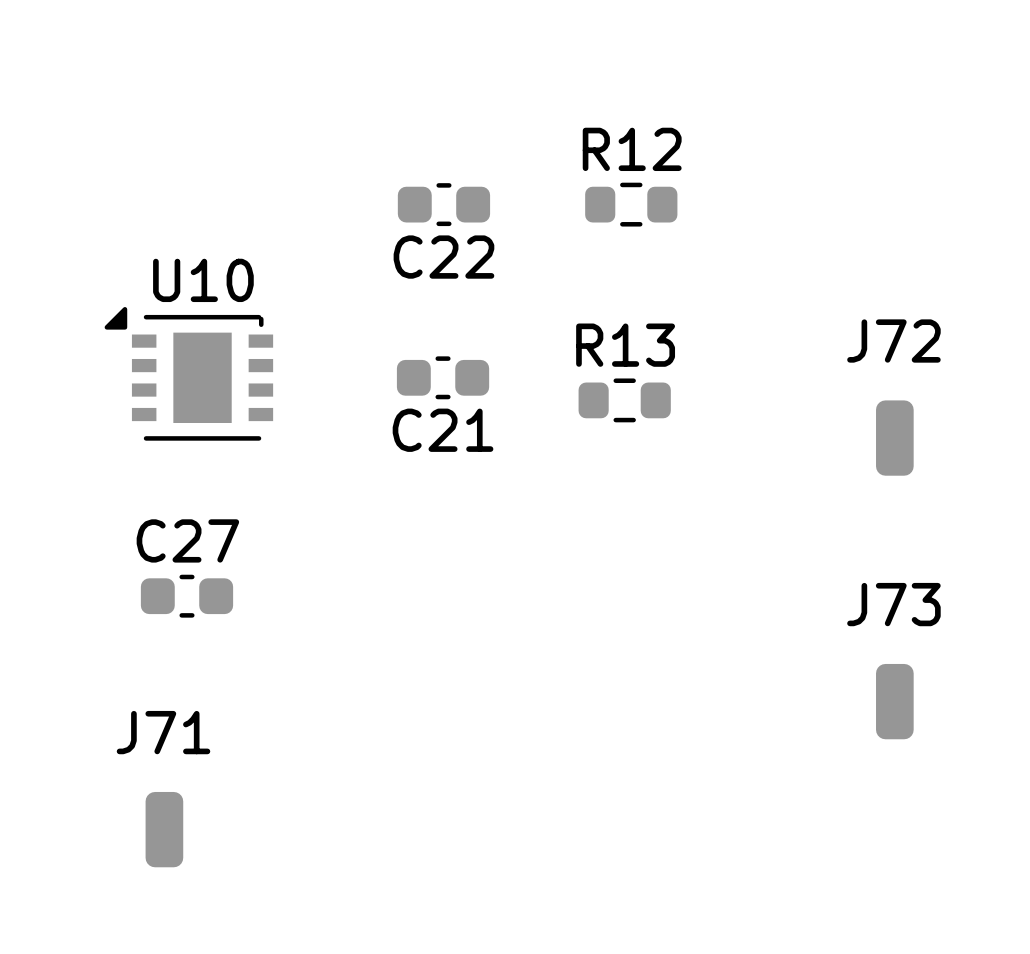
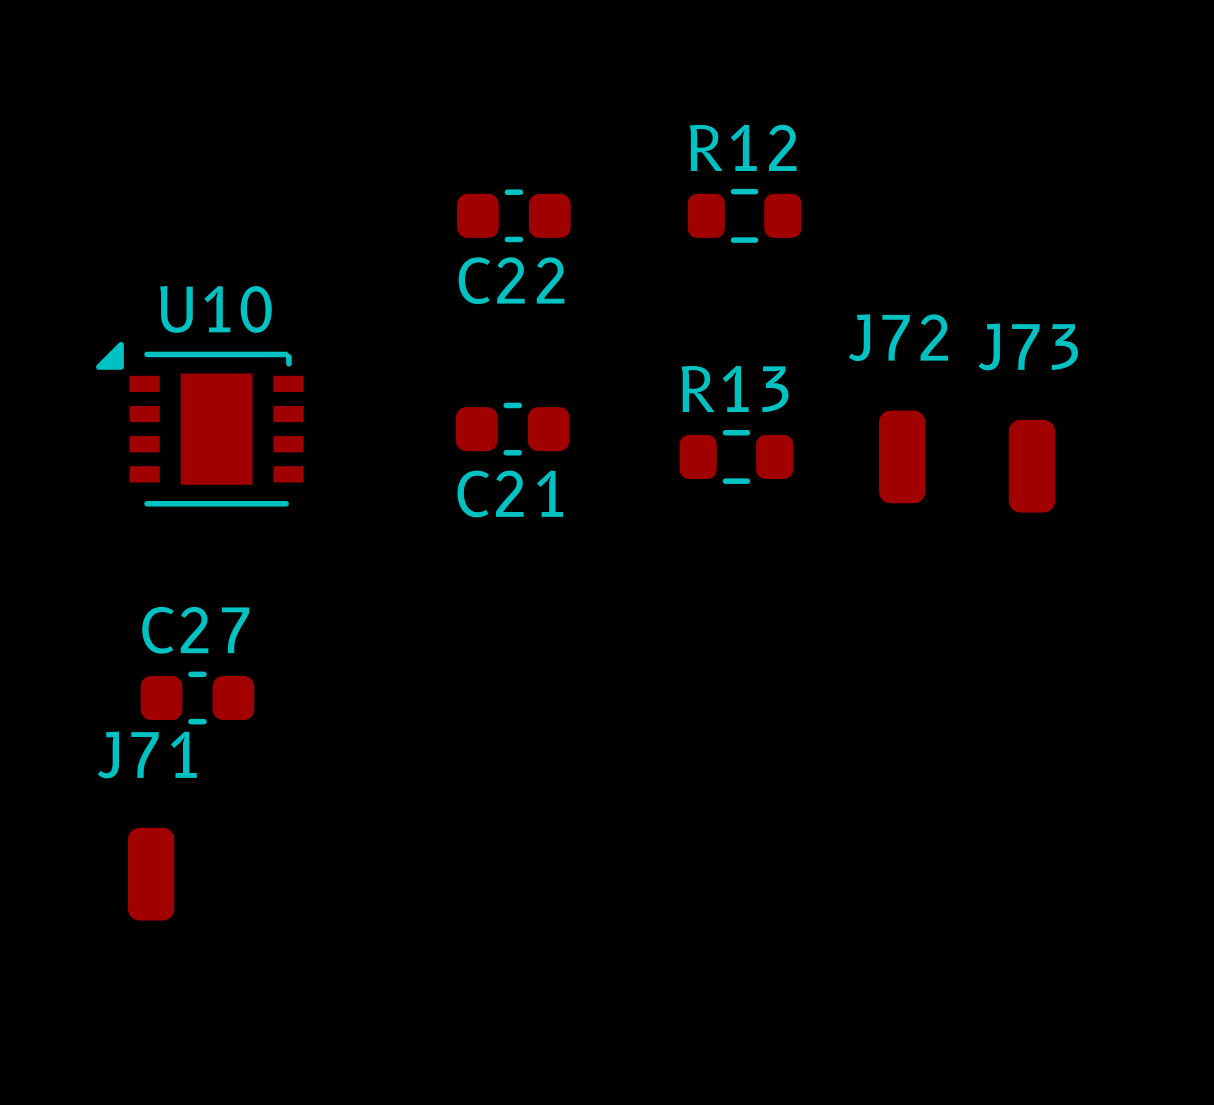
J72 position: (894, 438) -> (902, 456)
J73 position: (894, 701) -> (1031, 466)
J71 position: (164, 829) -> (151, 874)

